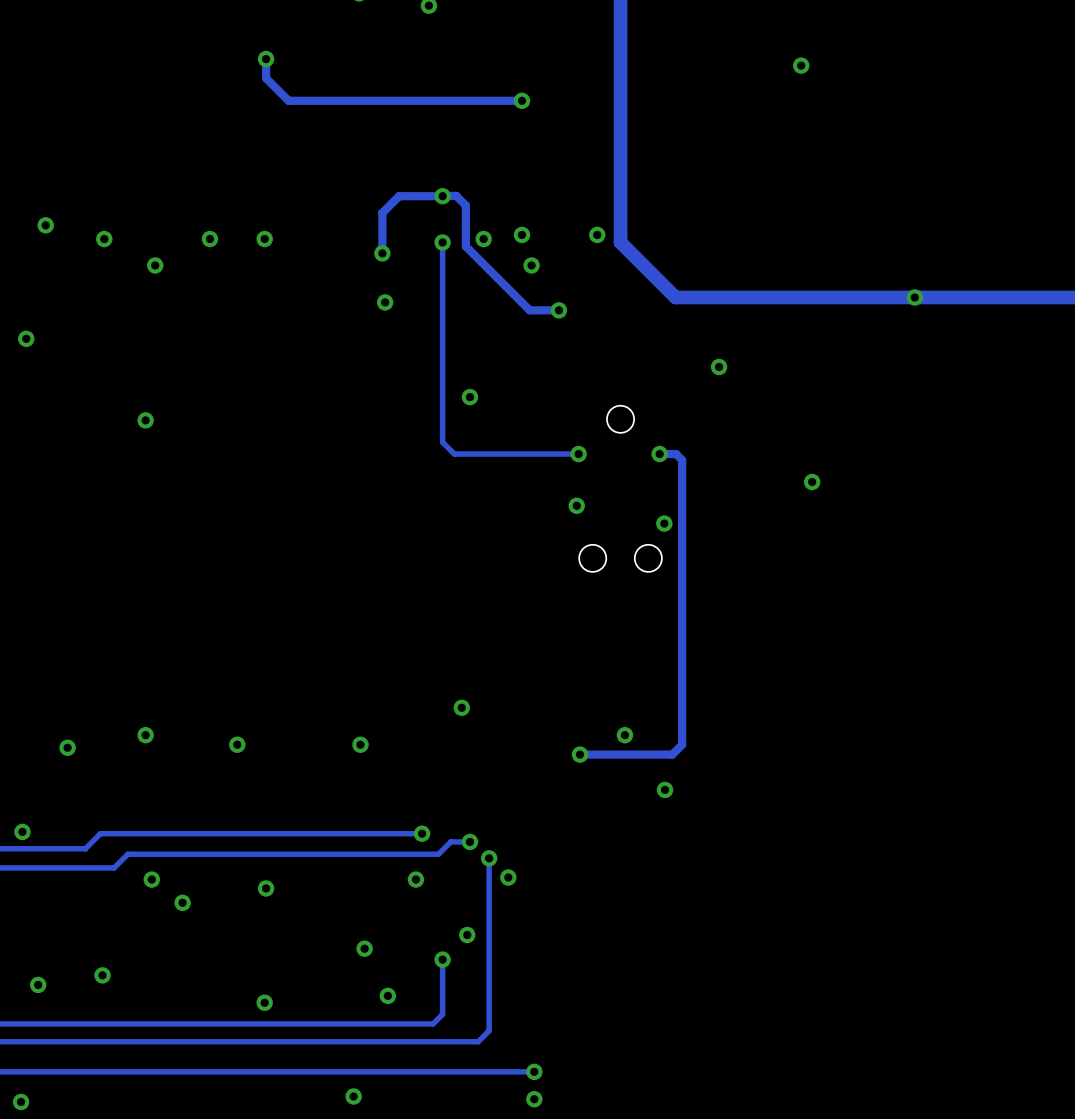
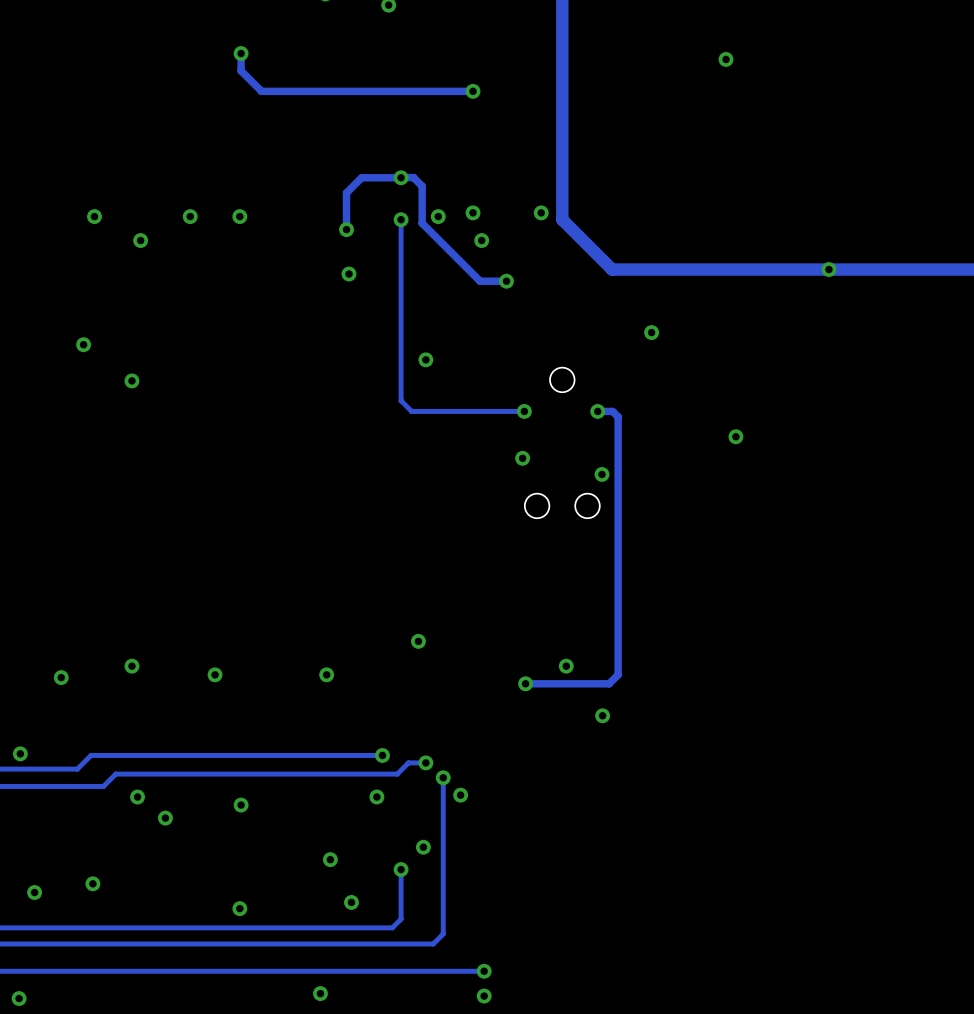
via: (45, 225) -> none
via: (26, 338) -> none
via: none -> (83, 344)

